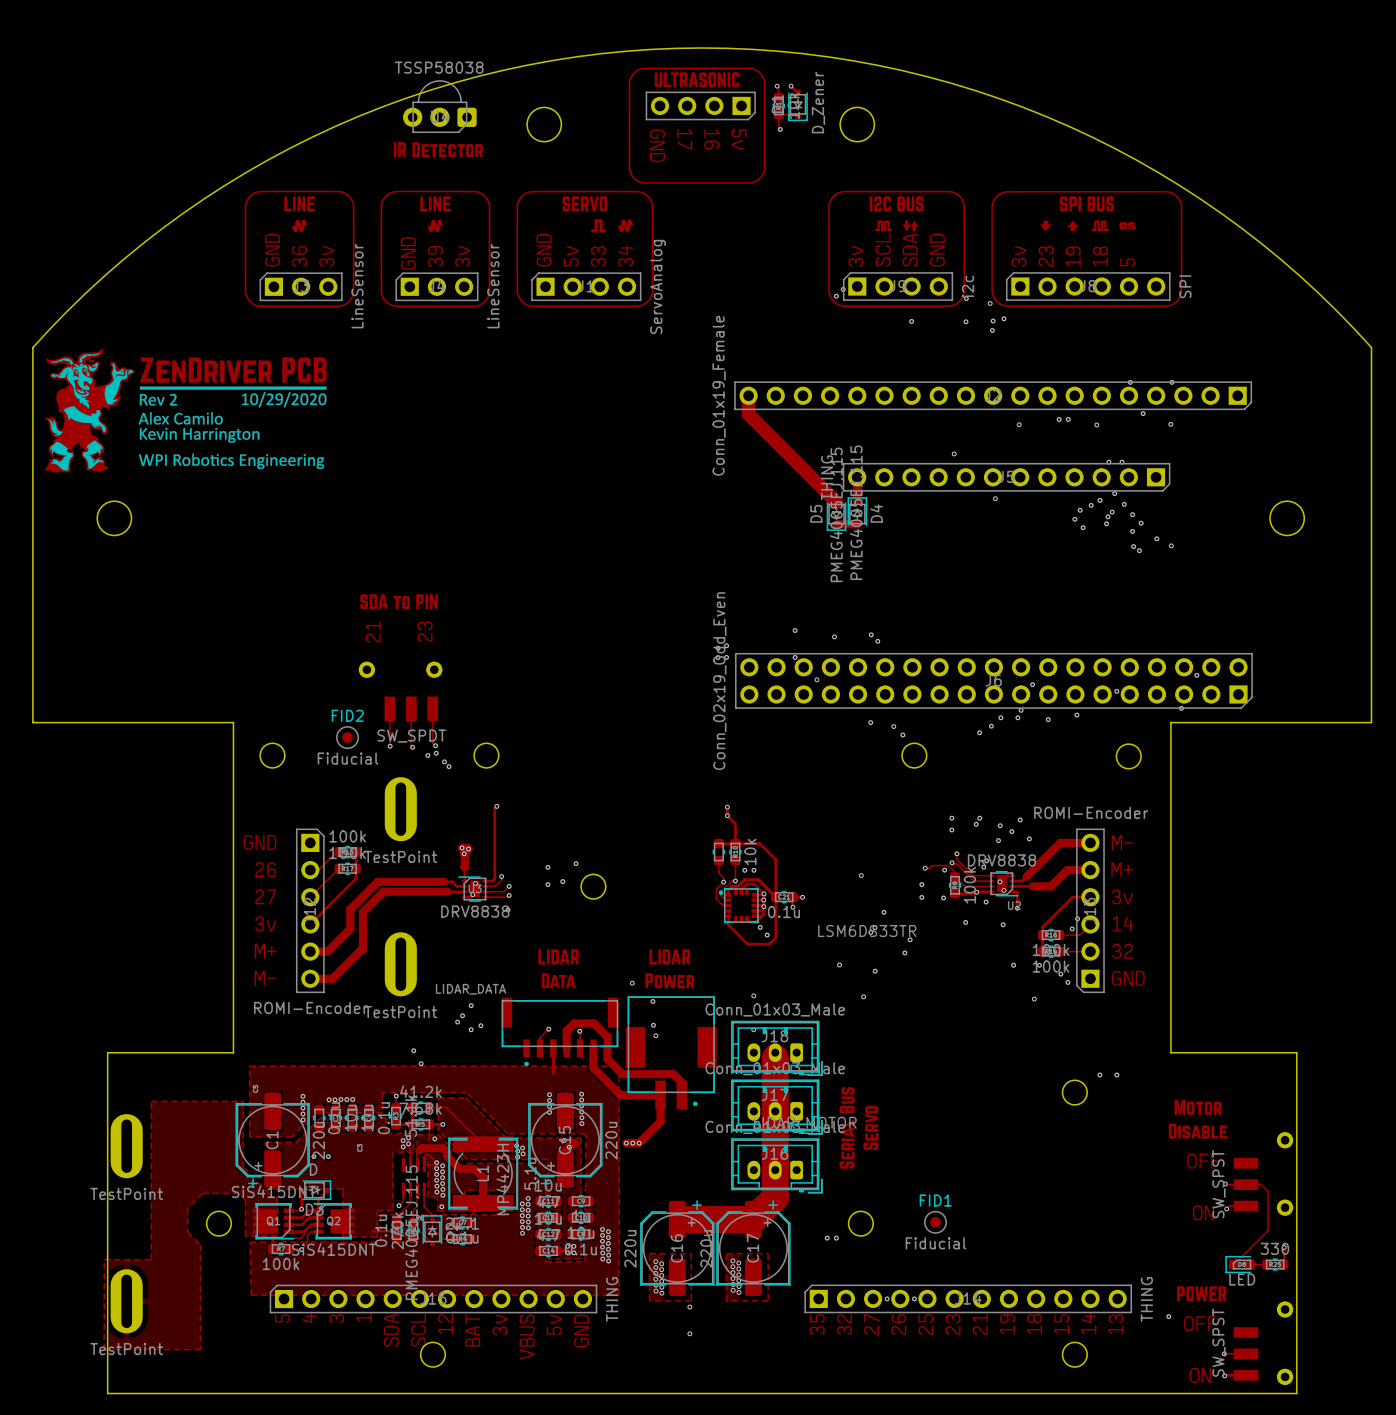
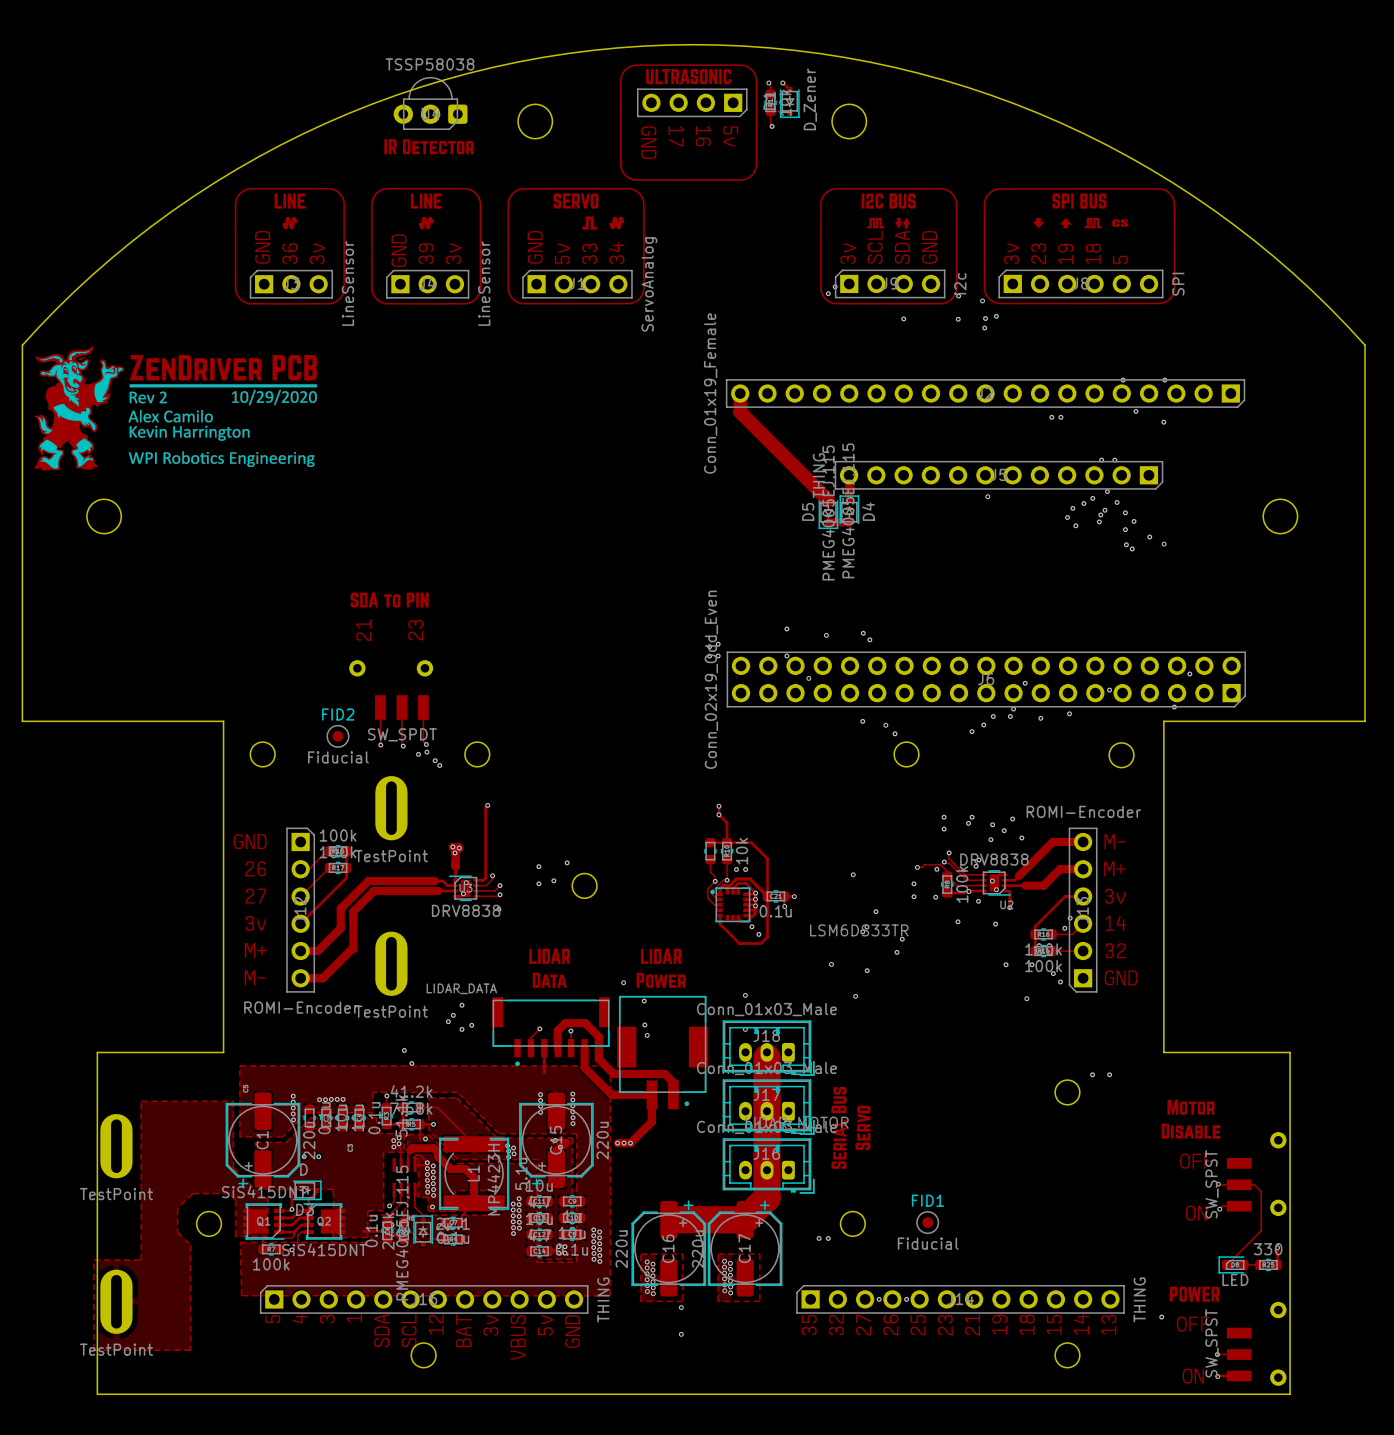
via: (1019, 424) -> none
via: (1096, 424) -> none
via: (954, 453) -> none

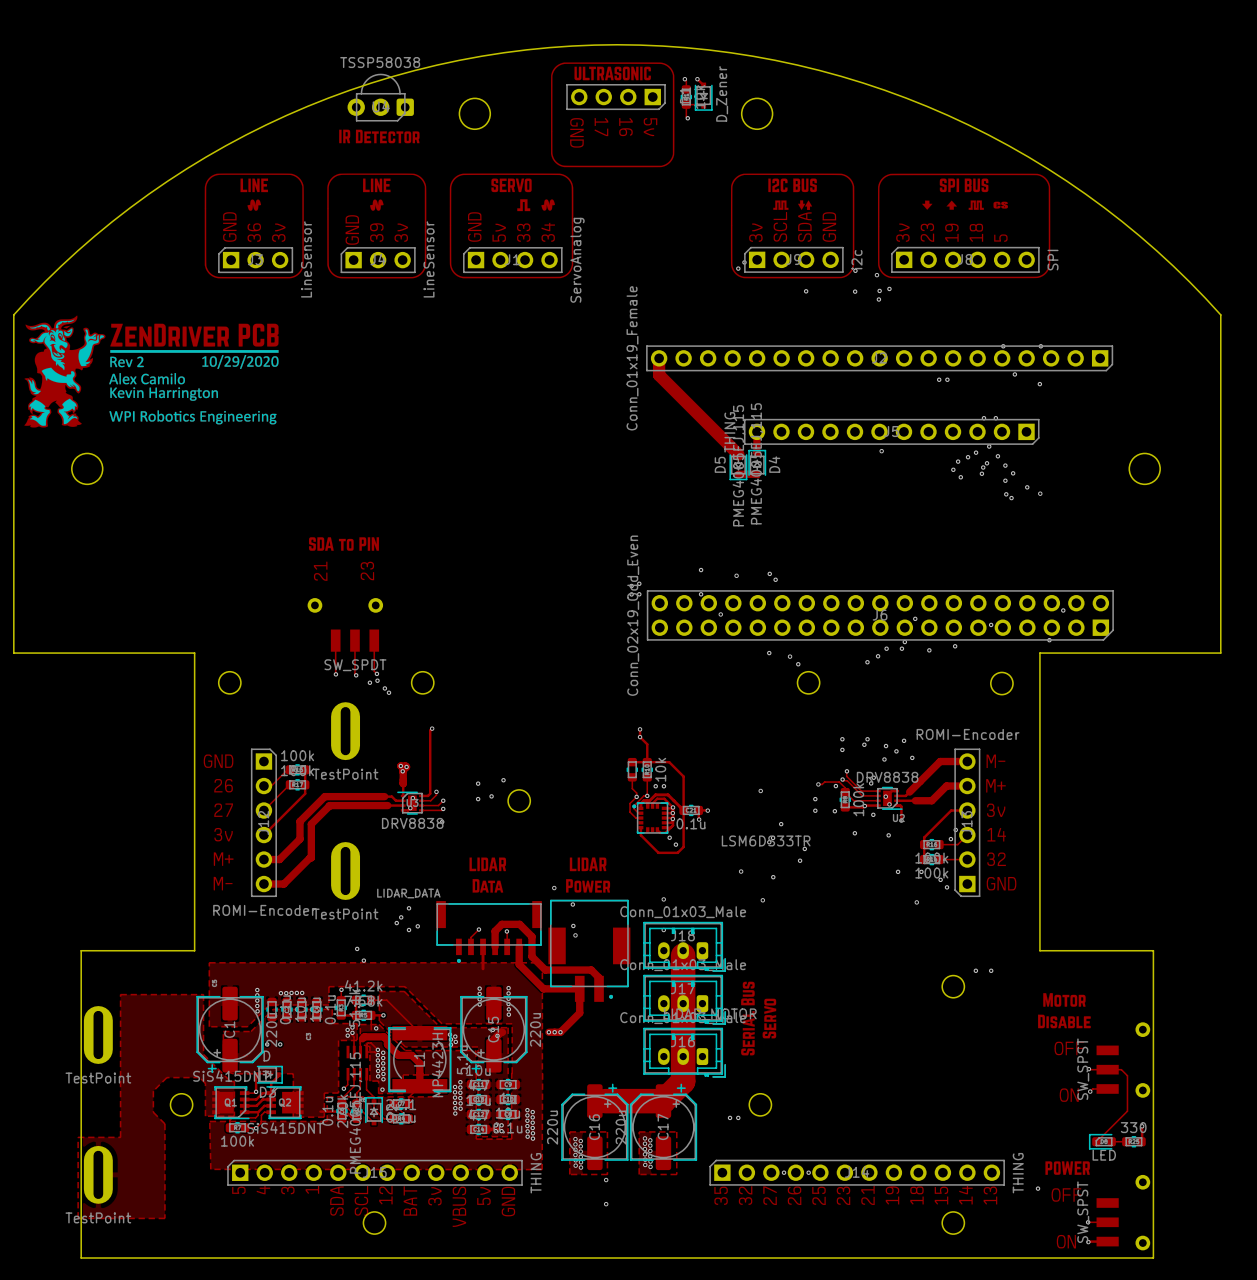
FID2: Fiducial (337, 736) -> none
FID1: Fiducial (927, 1222) -> none

